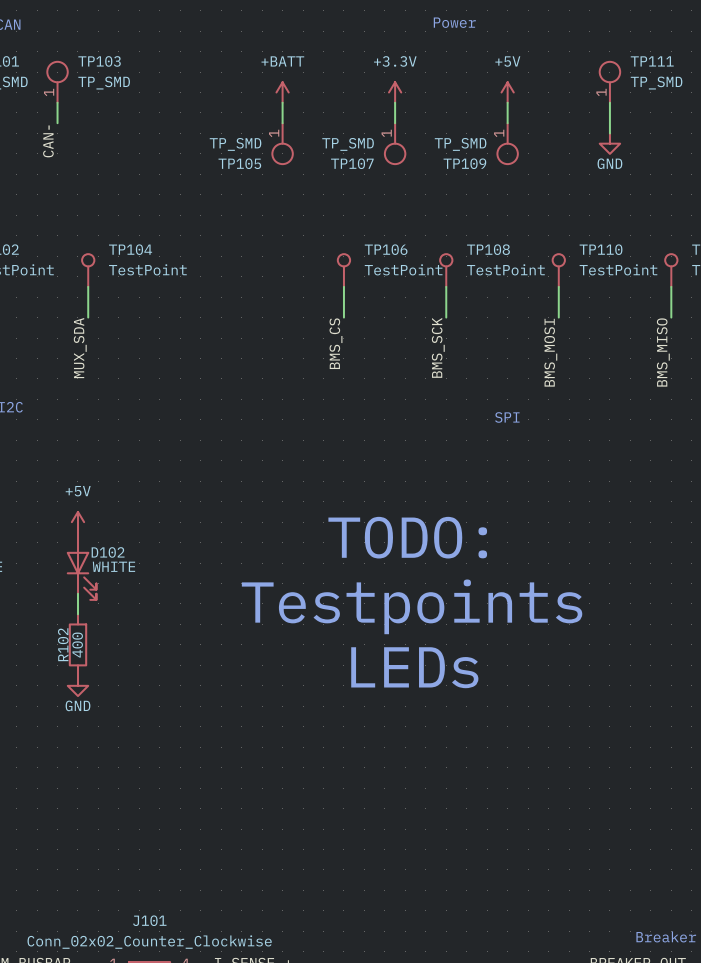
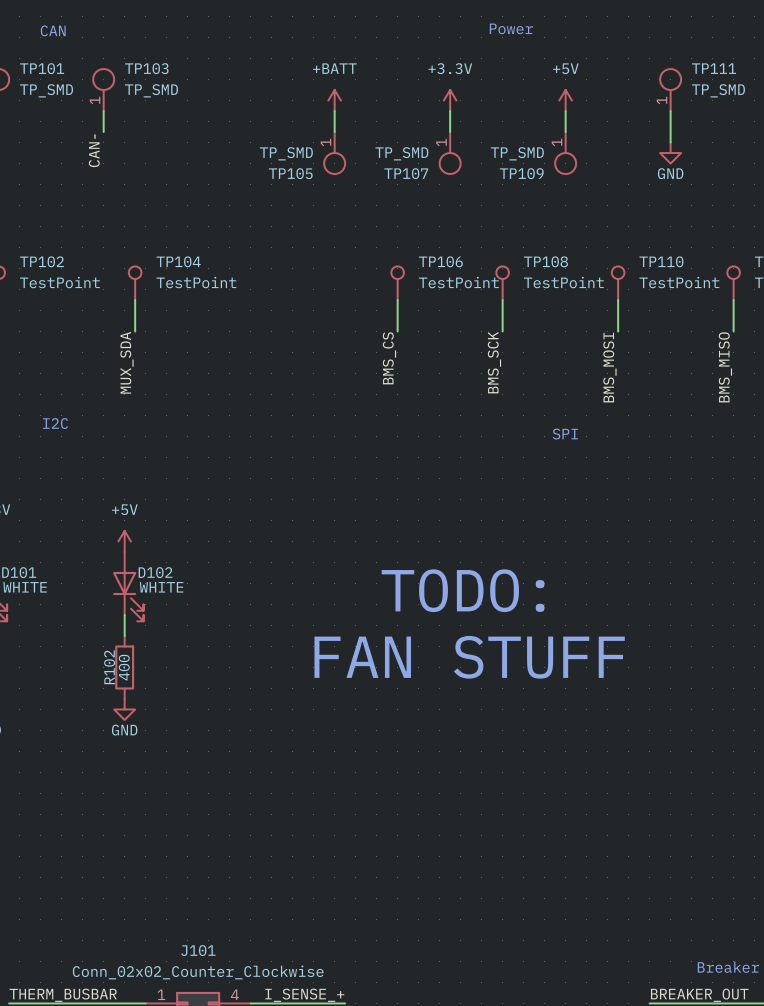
text position: TODO: (407, 537) -> TODO: (463, 590)
text: Testpoints (412, 606) -> none
text: none -> FAN STUFF (469, 657)
text: LEDs (414, 667) -> none

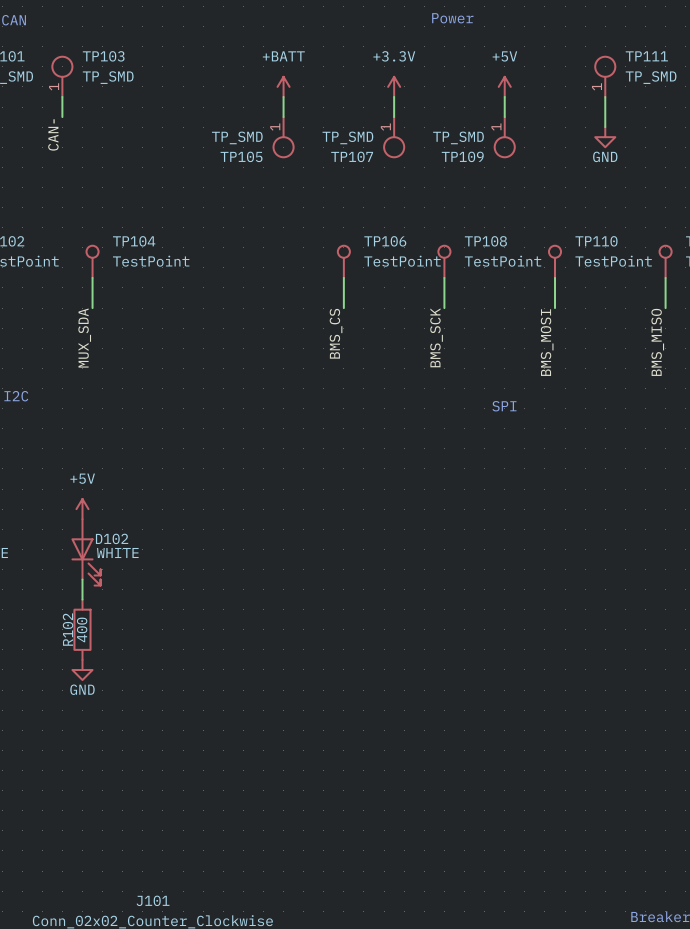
text: TODO: (463, 590) -> none
text: FAN STUFF (469, 657) -> none

